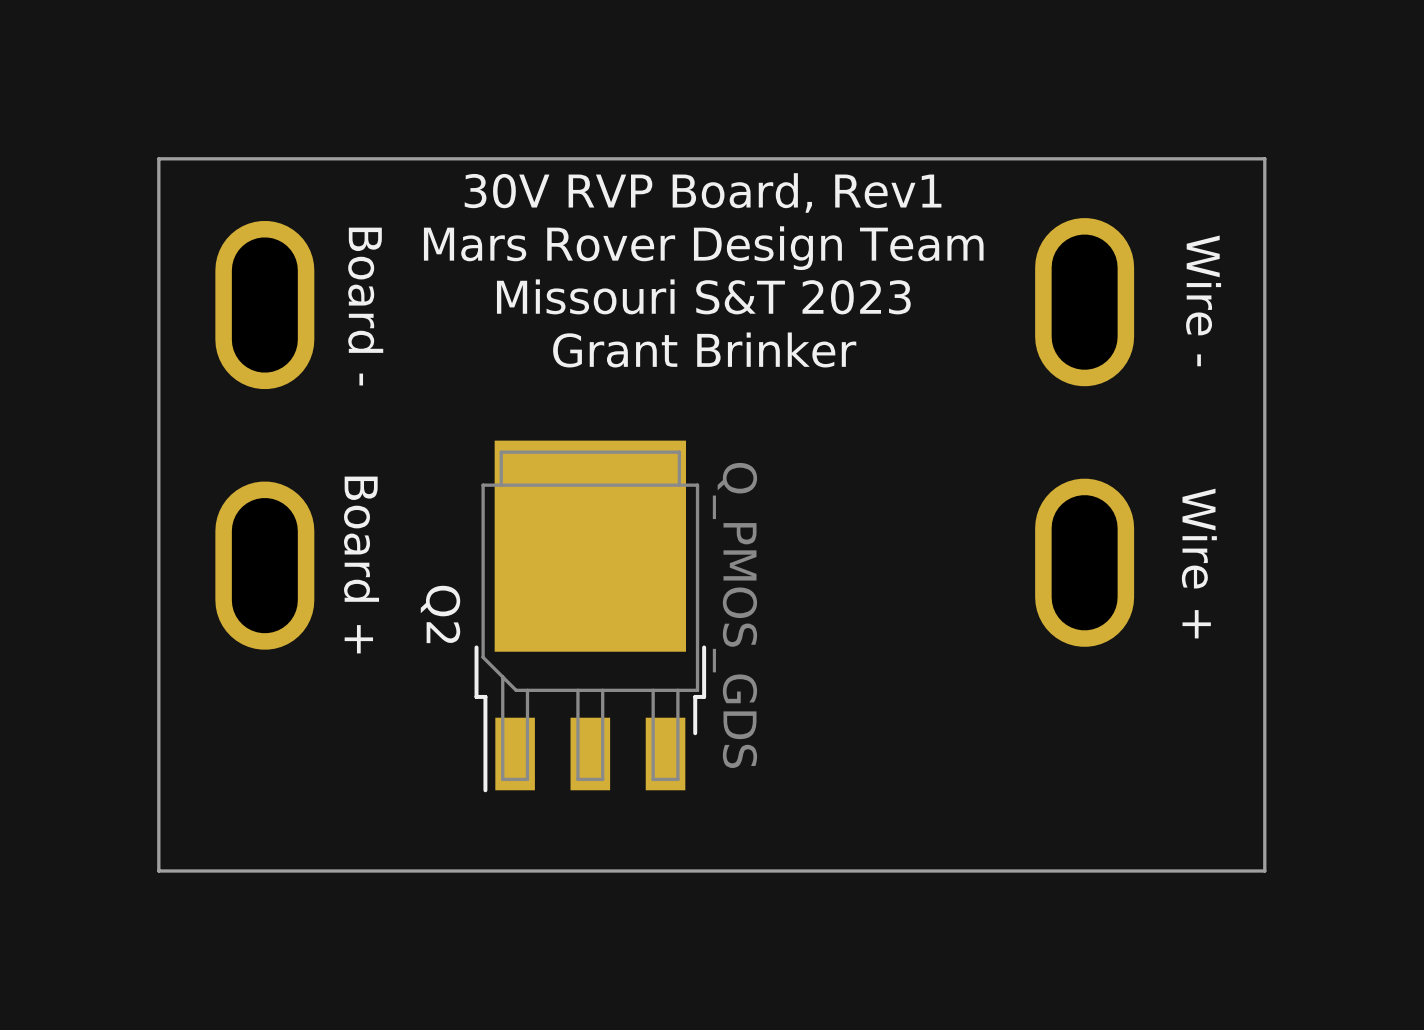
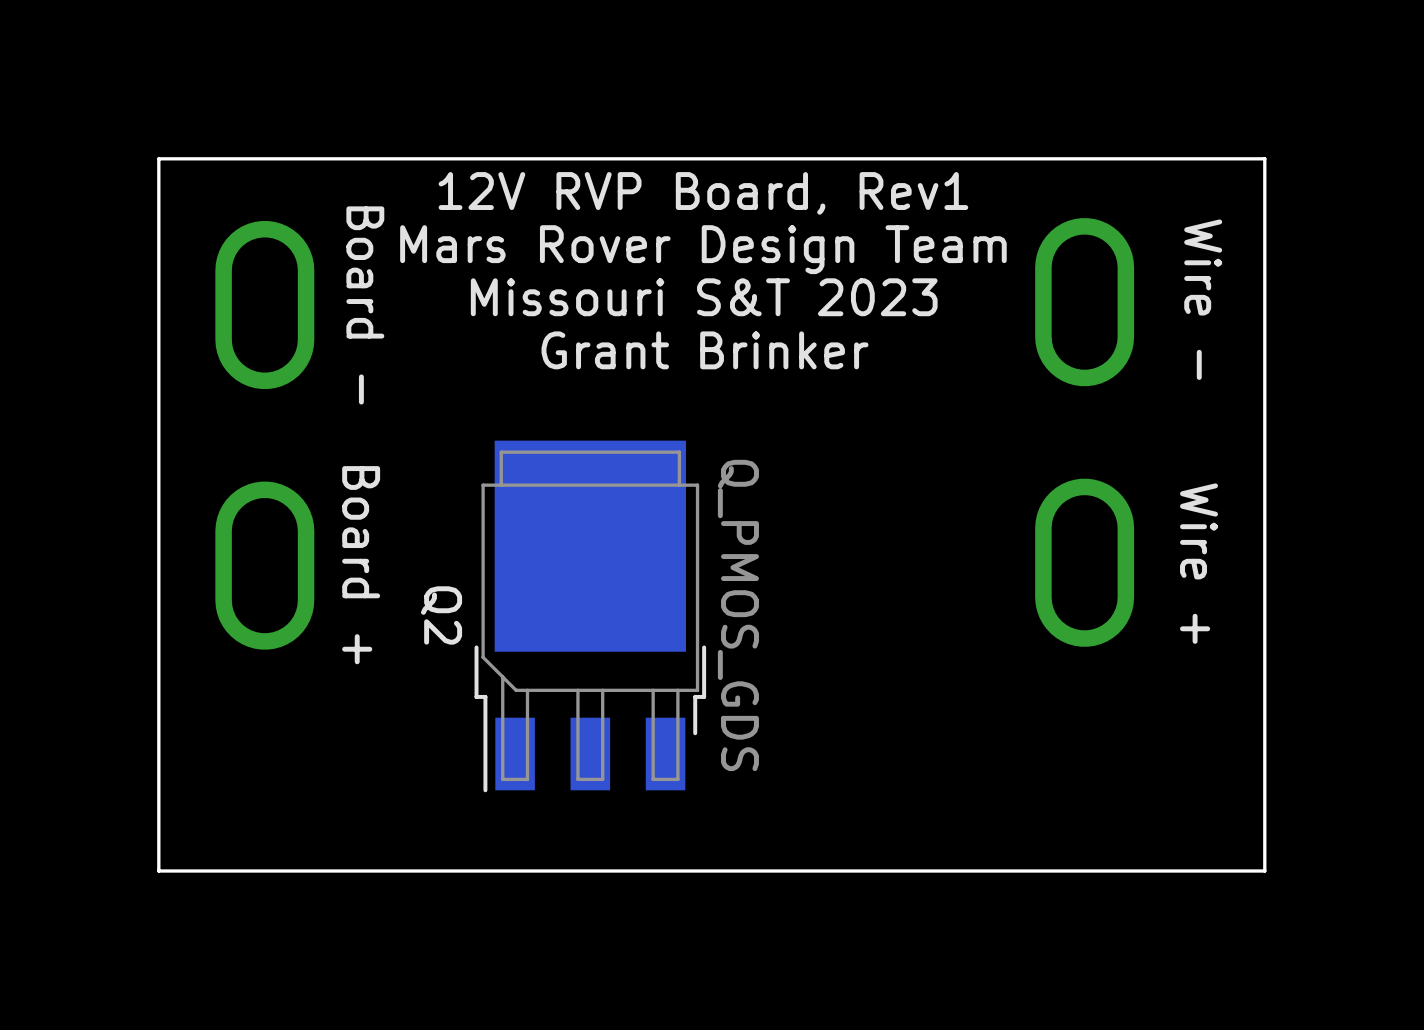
text: 30V RVP Board, Rev1 (703, 192) -> 12V RVP Board, Rev1 (703, 193)

